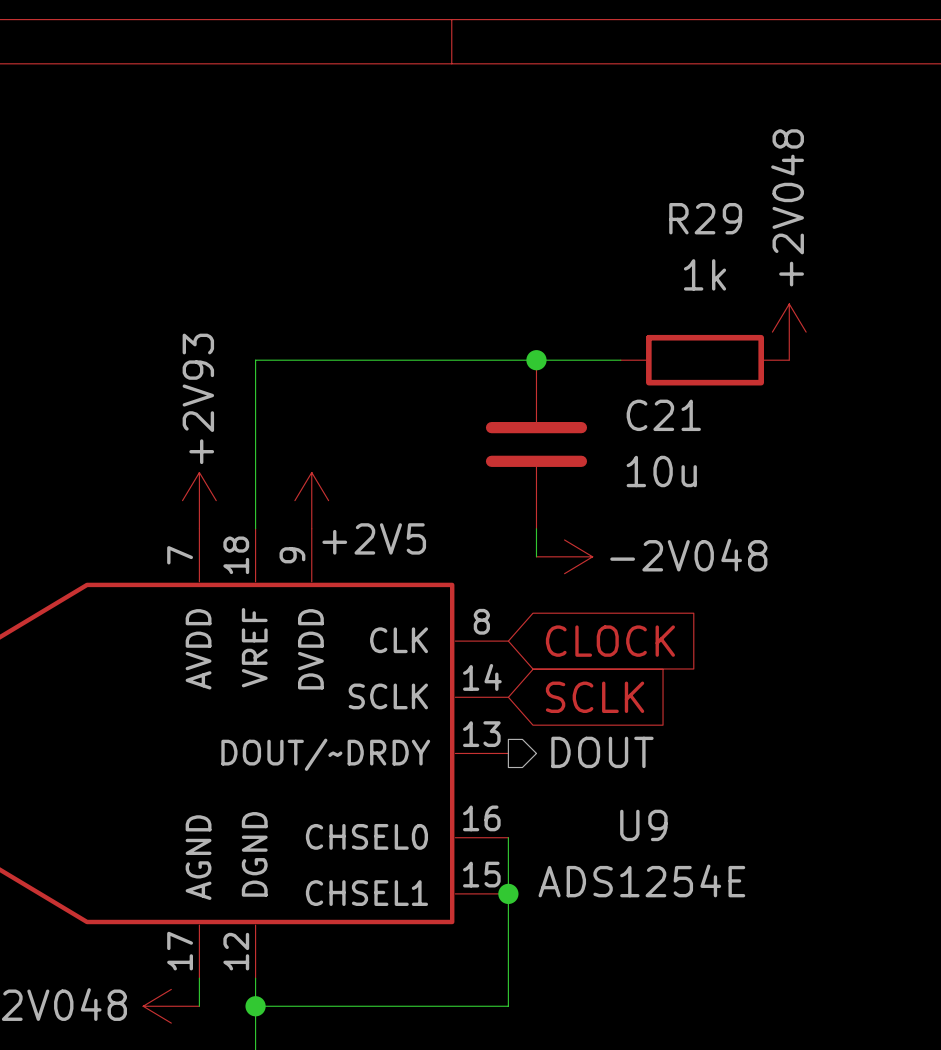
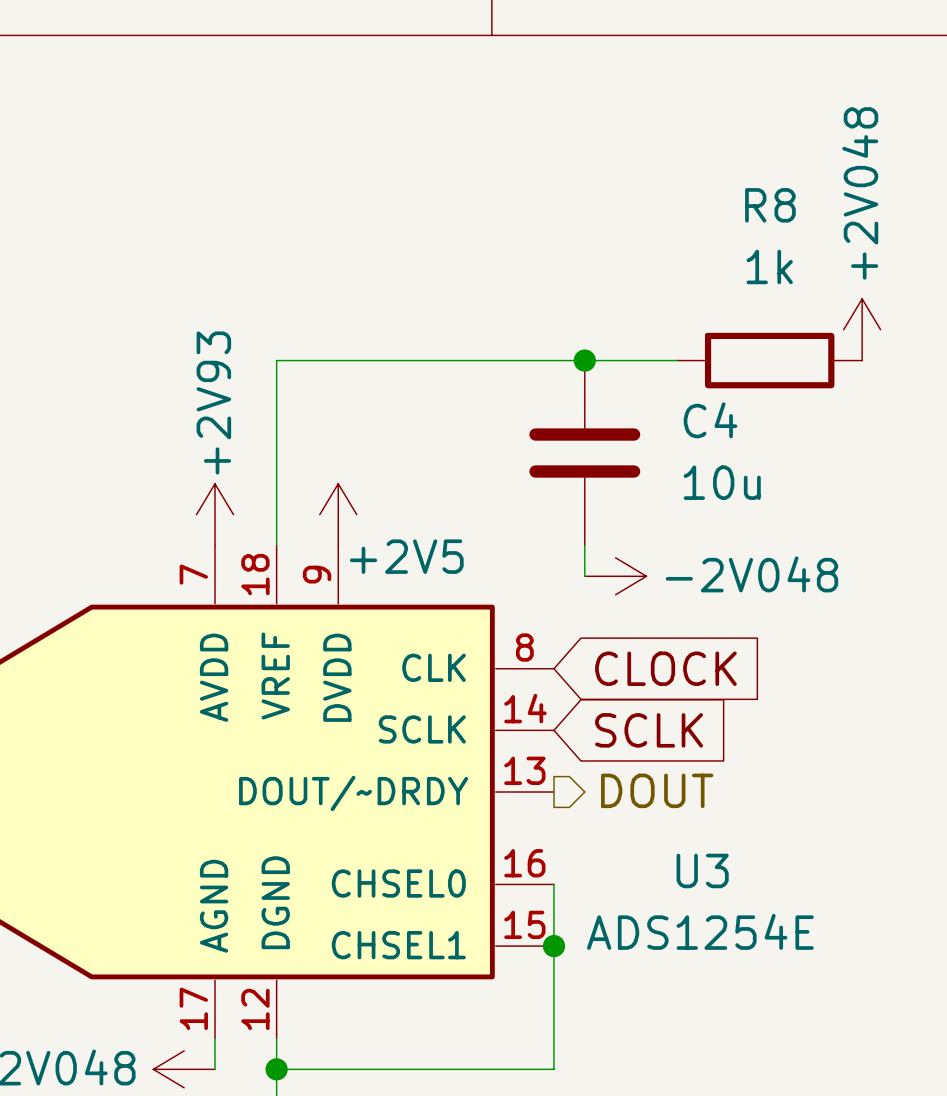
R29 name: R29 (705, 218) -> R8 (770, 205)
C21 name: C21 (663, 415) -> C4 (710, 420)
U9 name: U9 (643, 825) -> U3 (702, 870)

